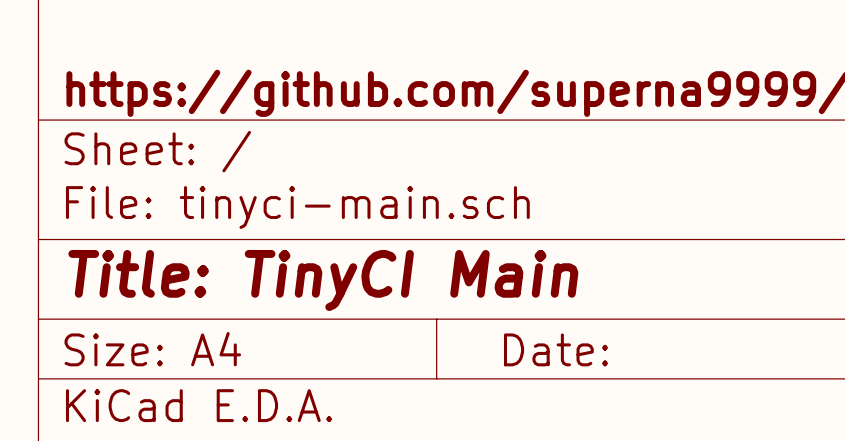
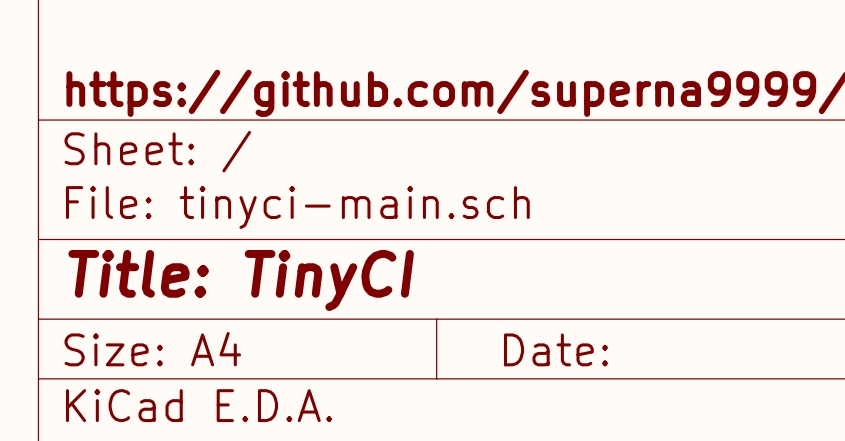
title block: Title: TinyCI Main (323, 280) -> Title: TinyCI (241, 280)

